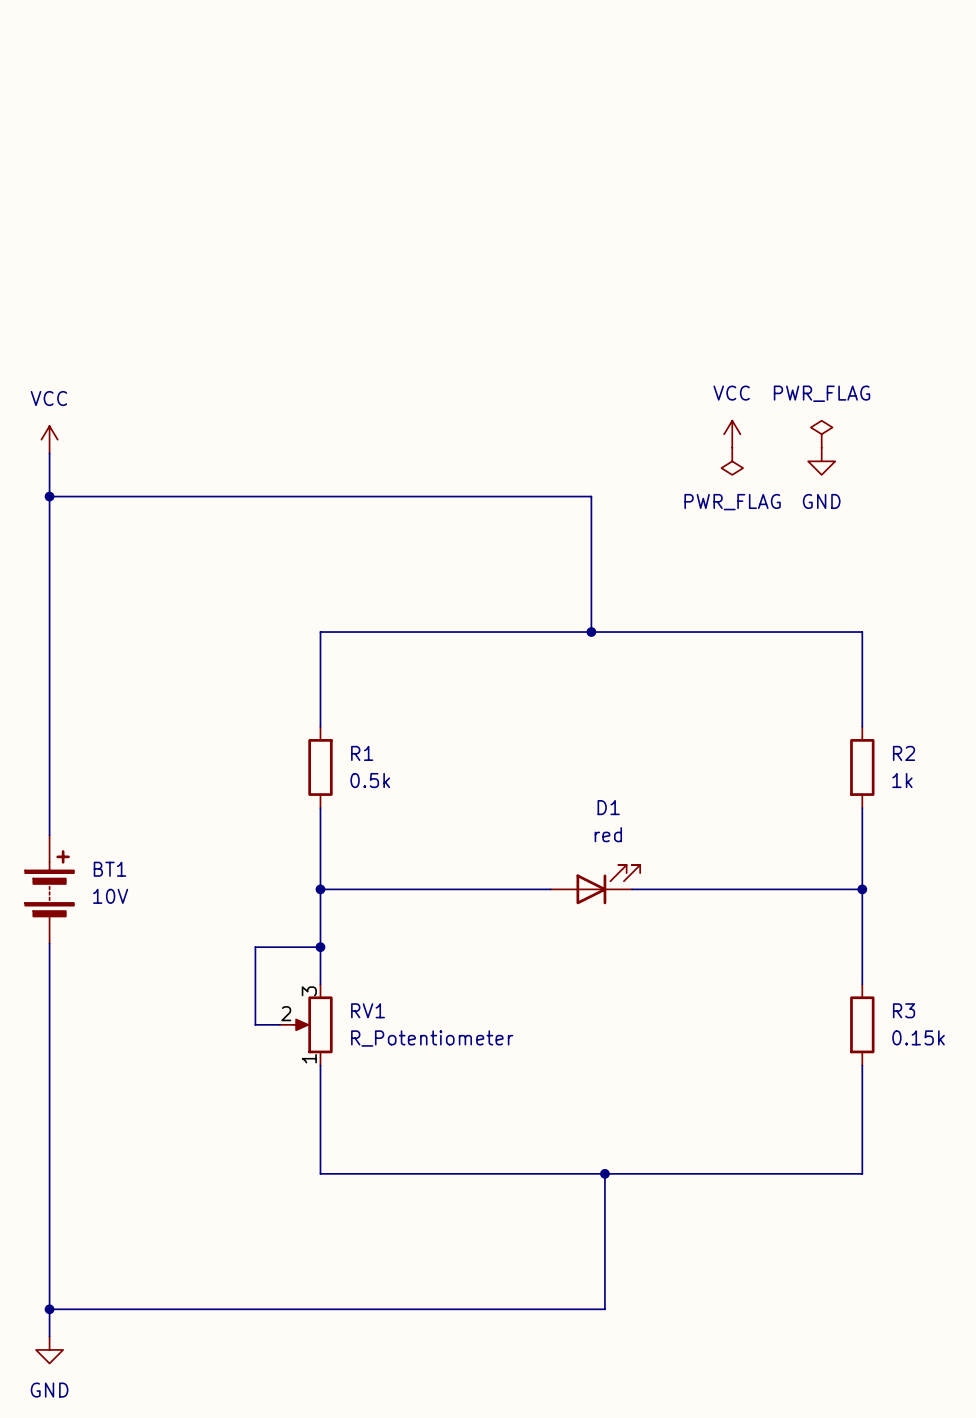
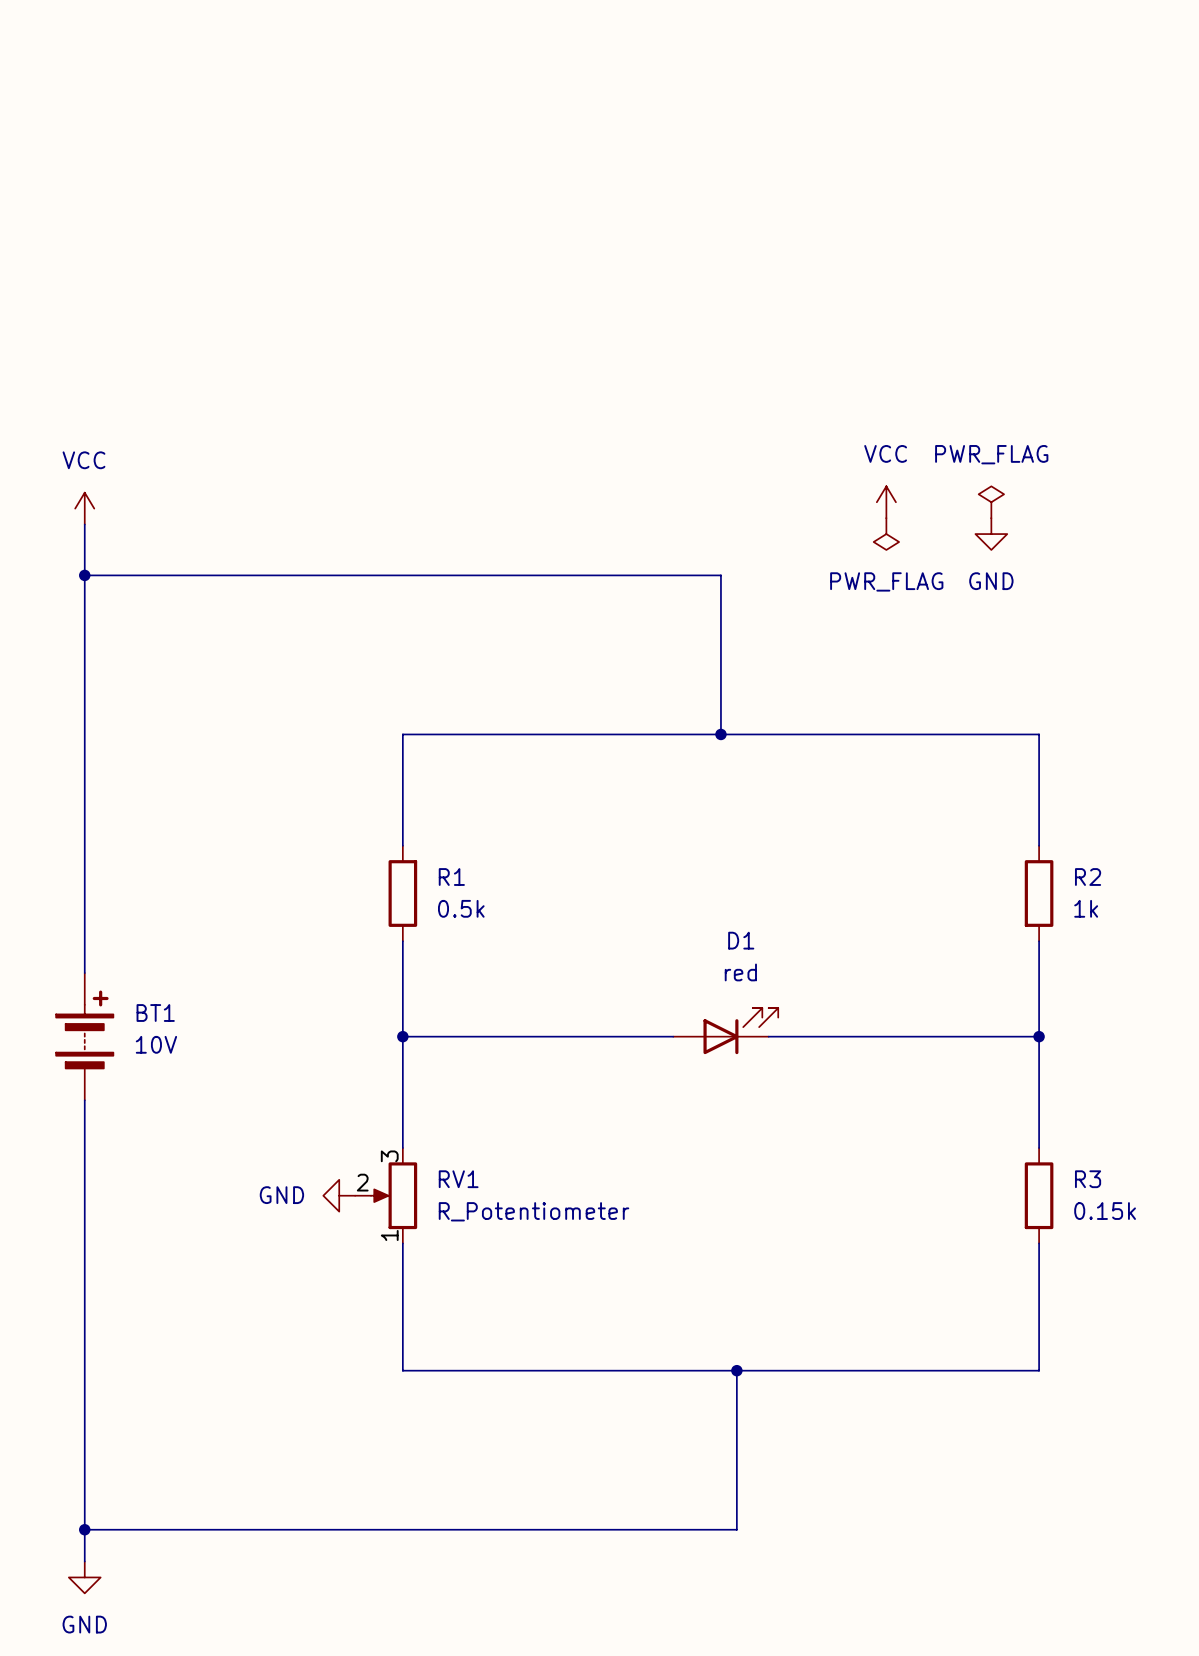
wire: (320, 947) (255, 947) (255, 1024) (279, 1024) -> none
junction: (320, 947) -> none
power symbol: none -> GND (339, 1195)

